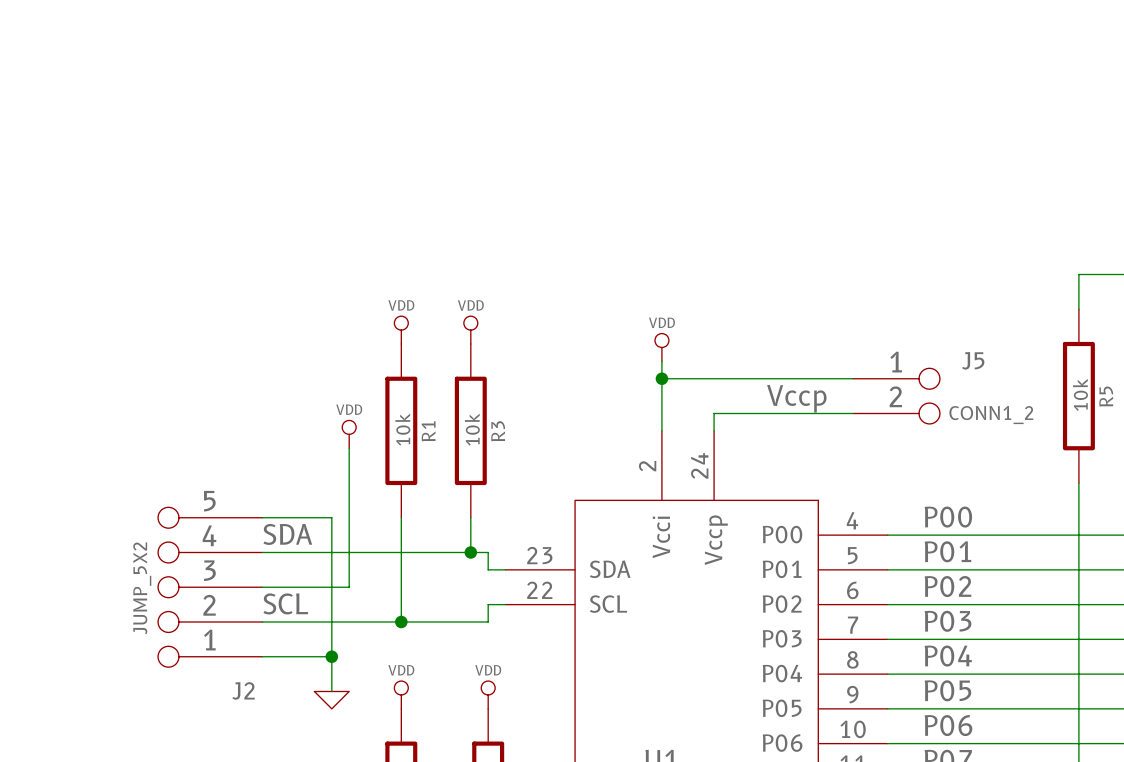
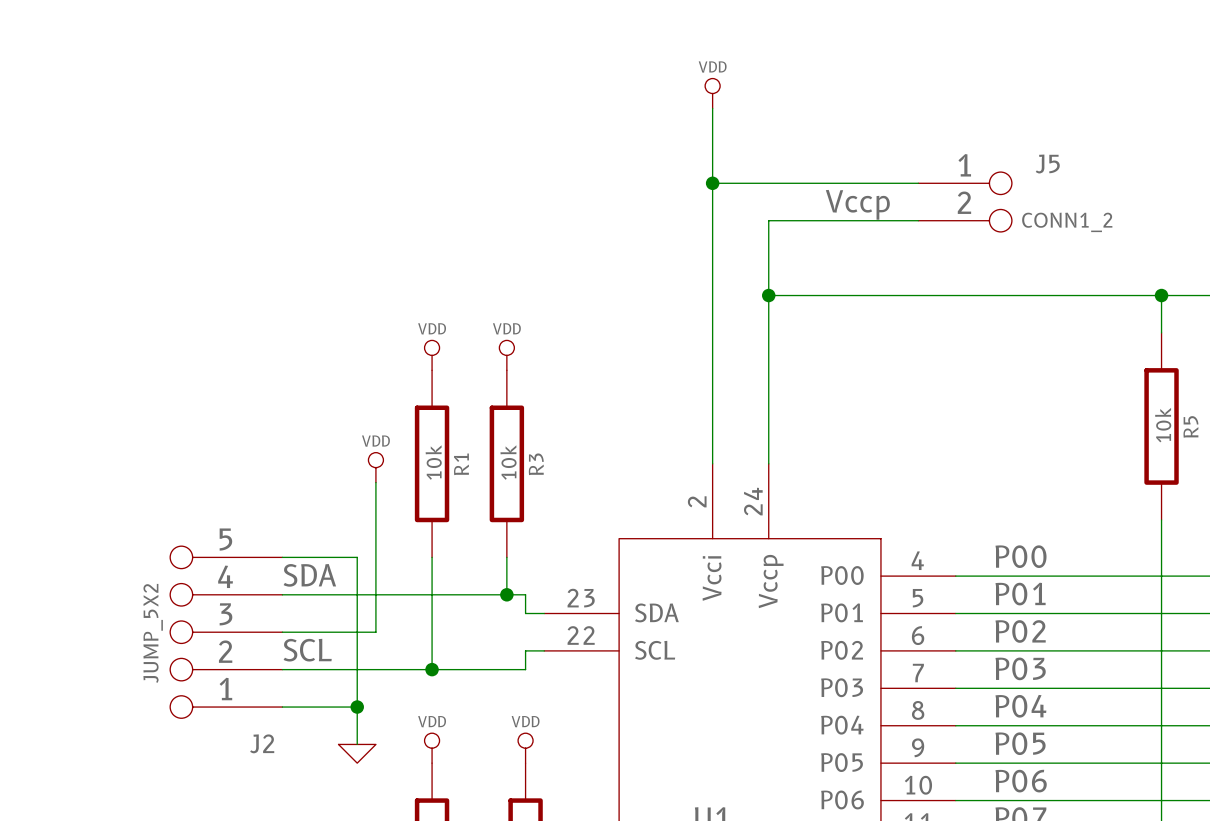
wire: none -> (712, 108) (712, 389)
junction: none -> (712, 183)
wire: none -> (768, 295) (1161, 295)
junction: none -> (768, 295)
junction: none -> (1161, 295)
power symbol position: VDD (661, 347) -> VDD (712, 93)
wire: (661, 378) (853, 378) -> (712, 183) (918, 183)
junction: (661, 378) -> none
J5 position: (896, 396) -> (965, 202)
label position: Vccp (796, 398) -> Vccp (857, 204)
wire: (714, 413) (853, 413) -> (768, 445) (768, 220) (918, 220)

